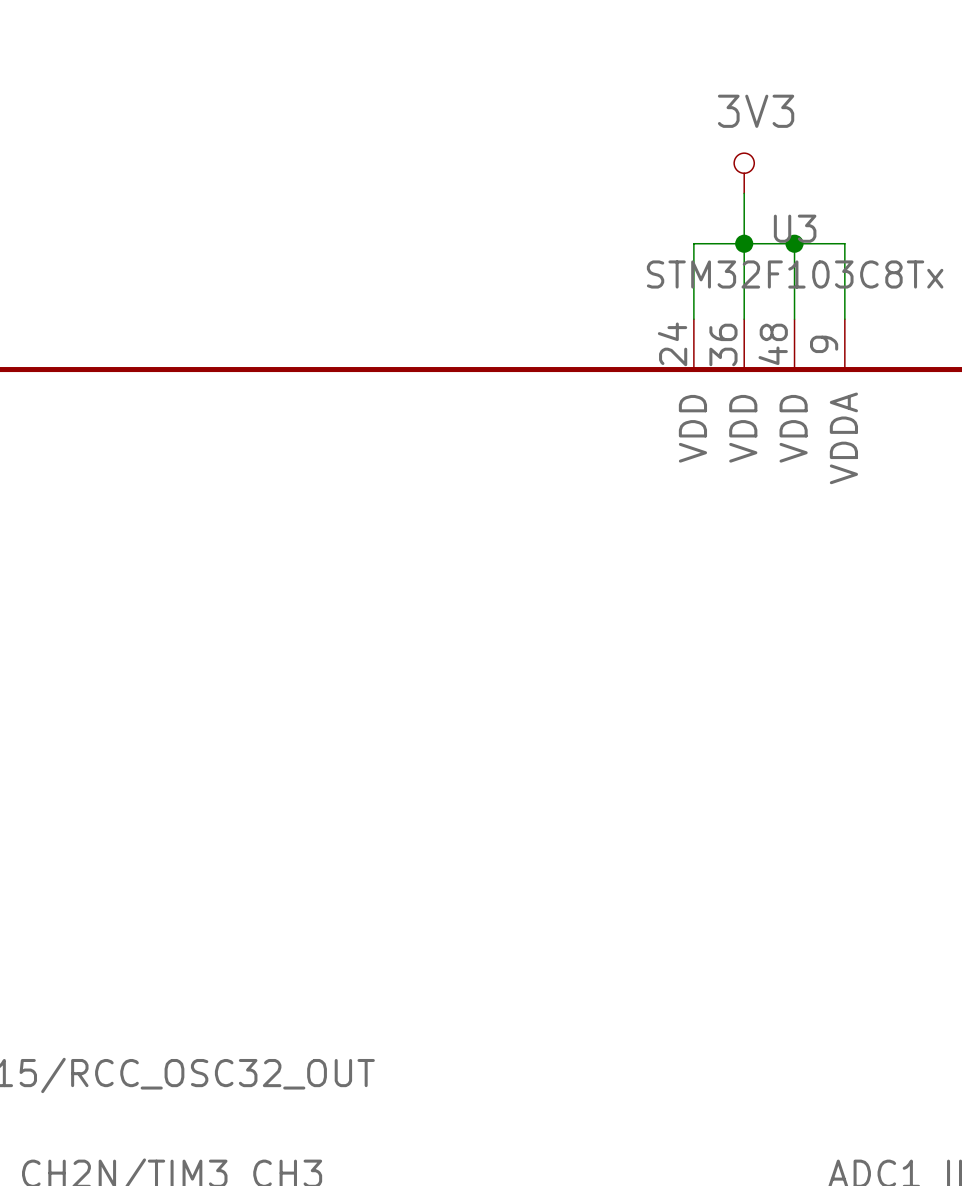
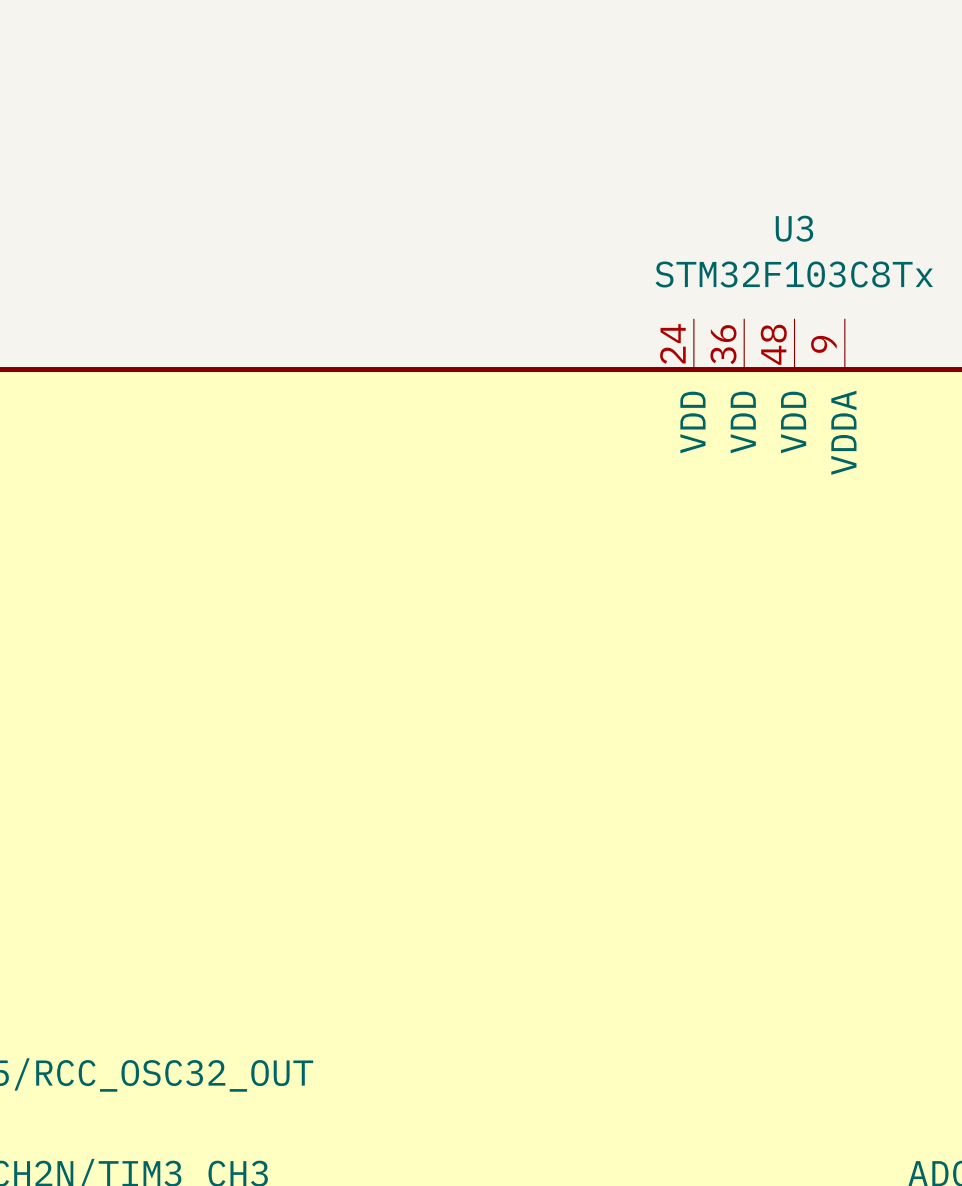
power symbol: 3V3 (744, 173) -> none
wire: (744, 193) (744, 319) -> none
junction: (744, 243) -> none
wire: (794, 243) (794, 319) -> none
junction: (794, 243) -> none
wire: (693, 319) (693, 243) (844, 243) (844, 319) -> none

